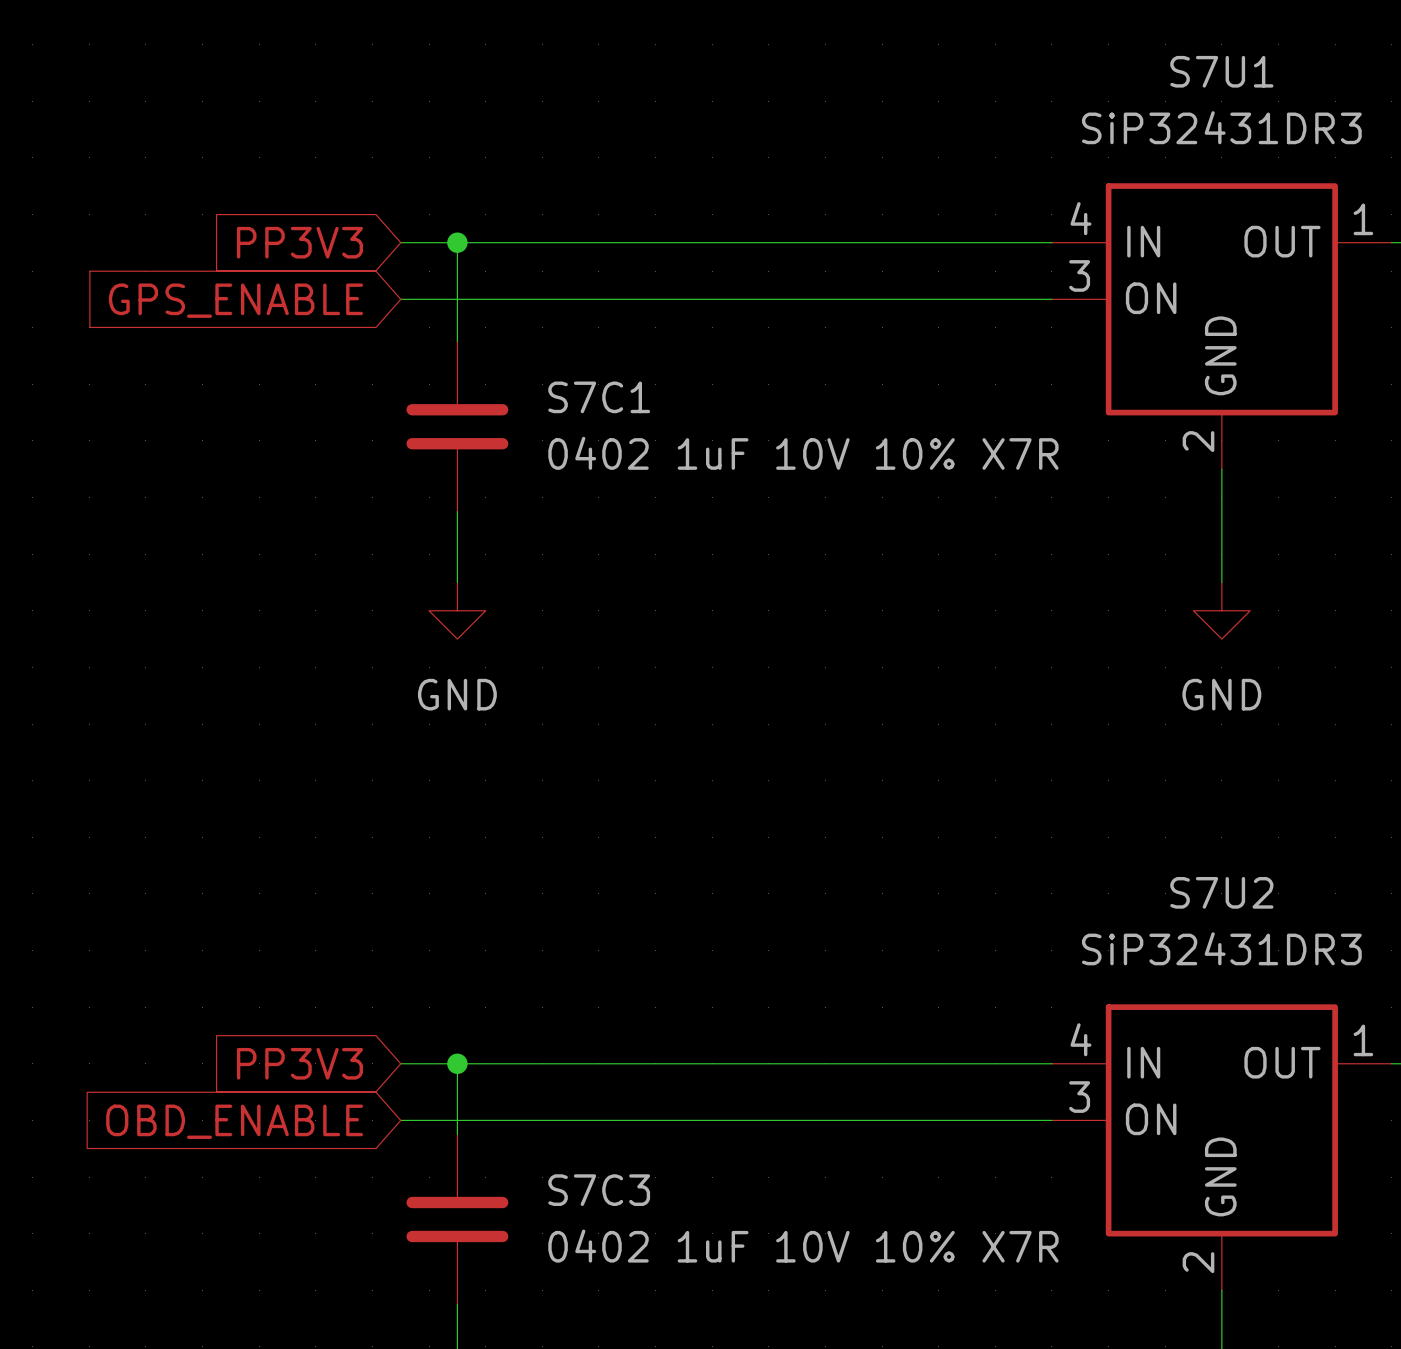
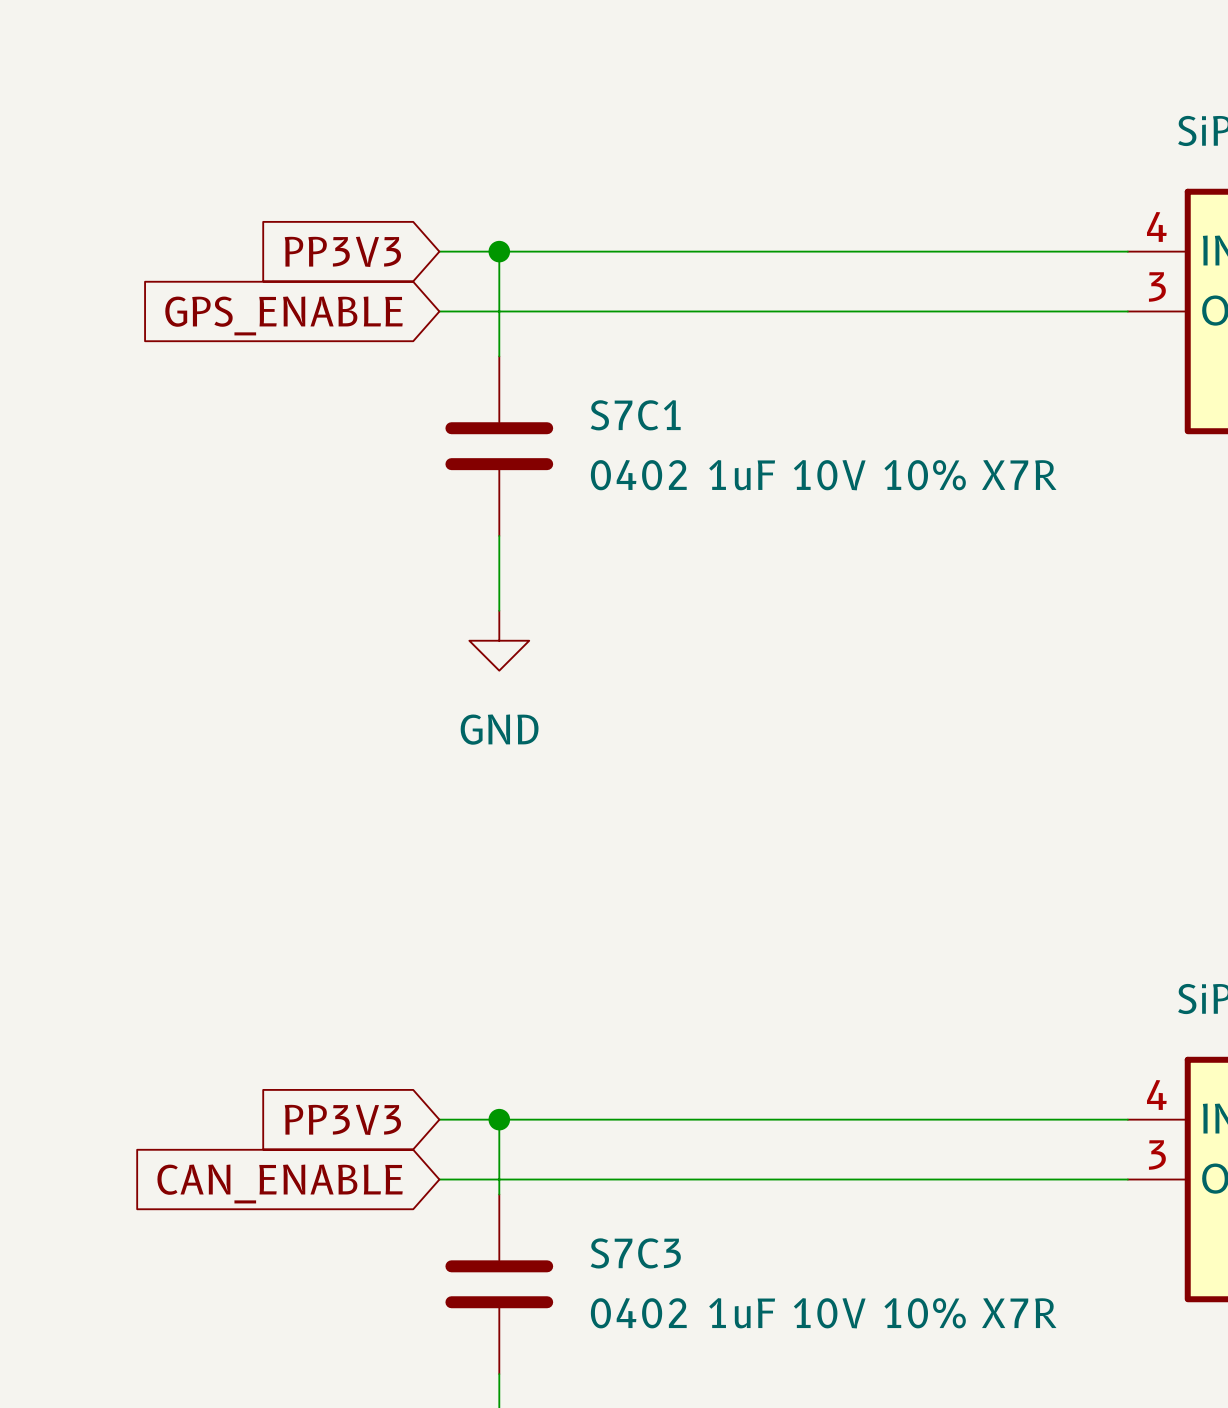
global label: OBD_ENABLE (234, 1121) -> CAN_ENABLE (280, 1184)

